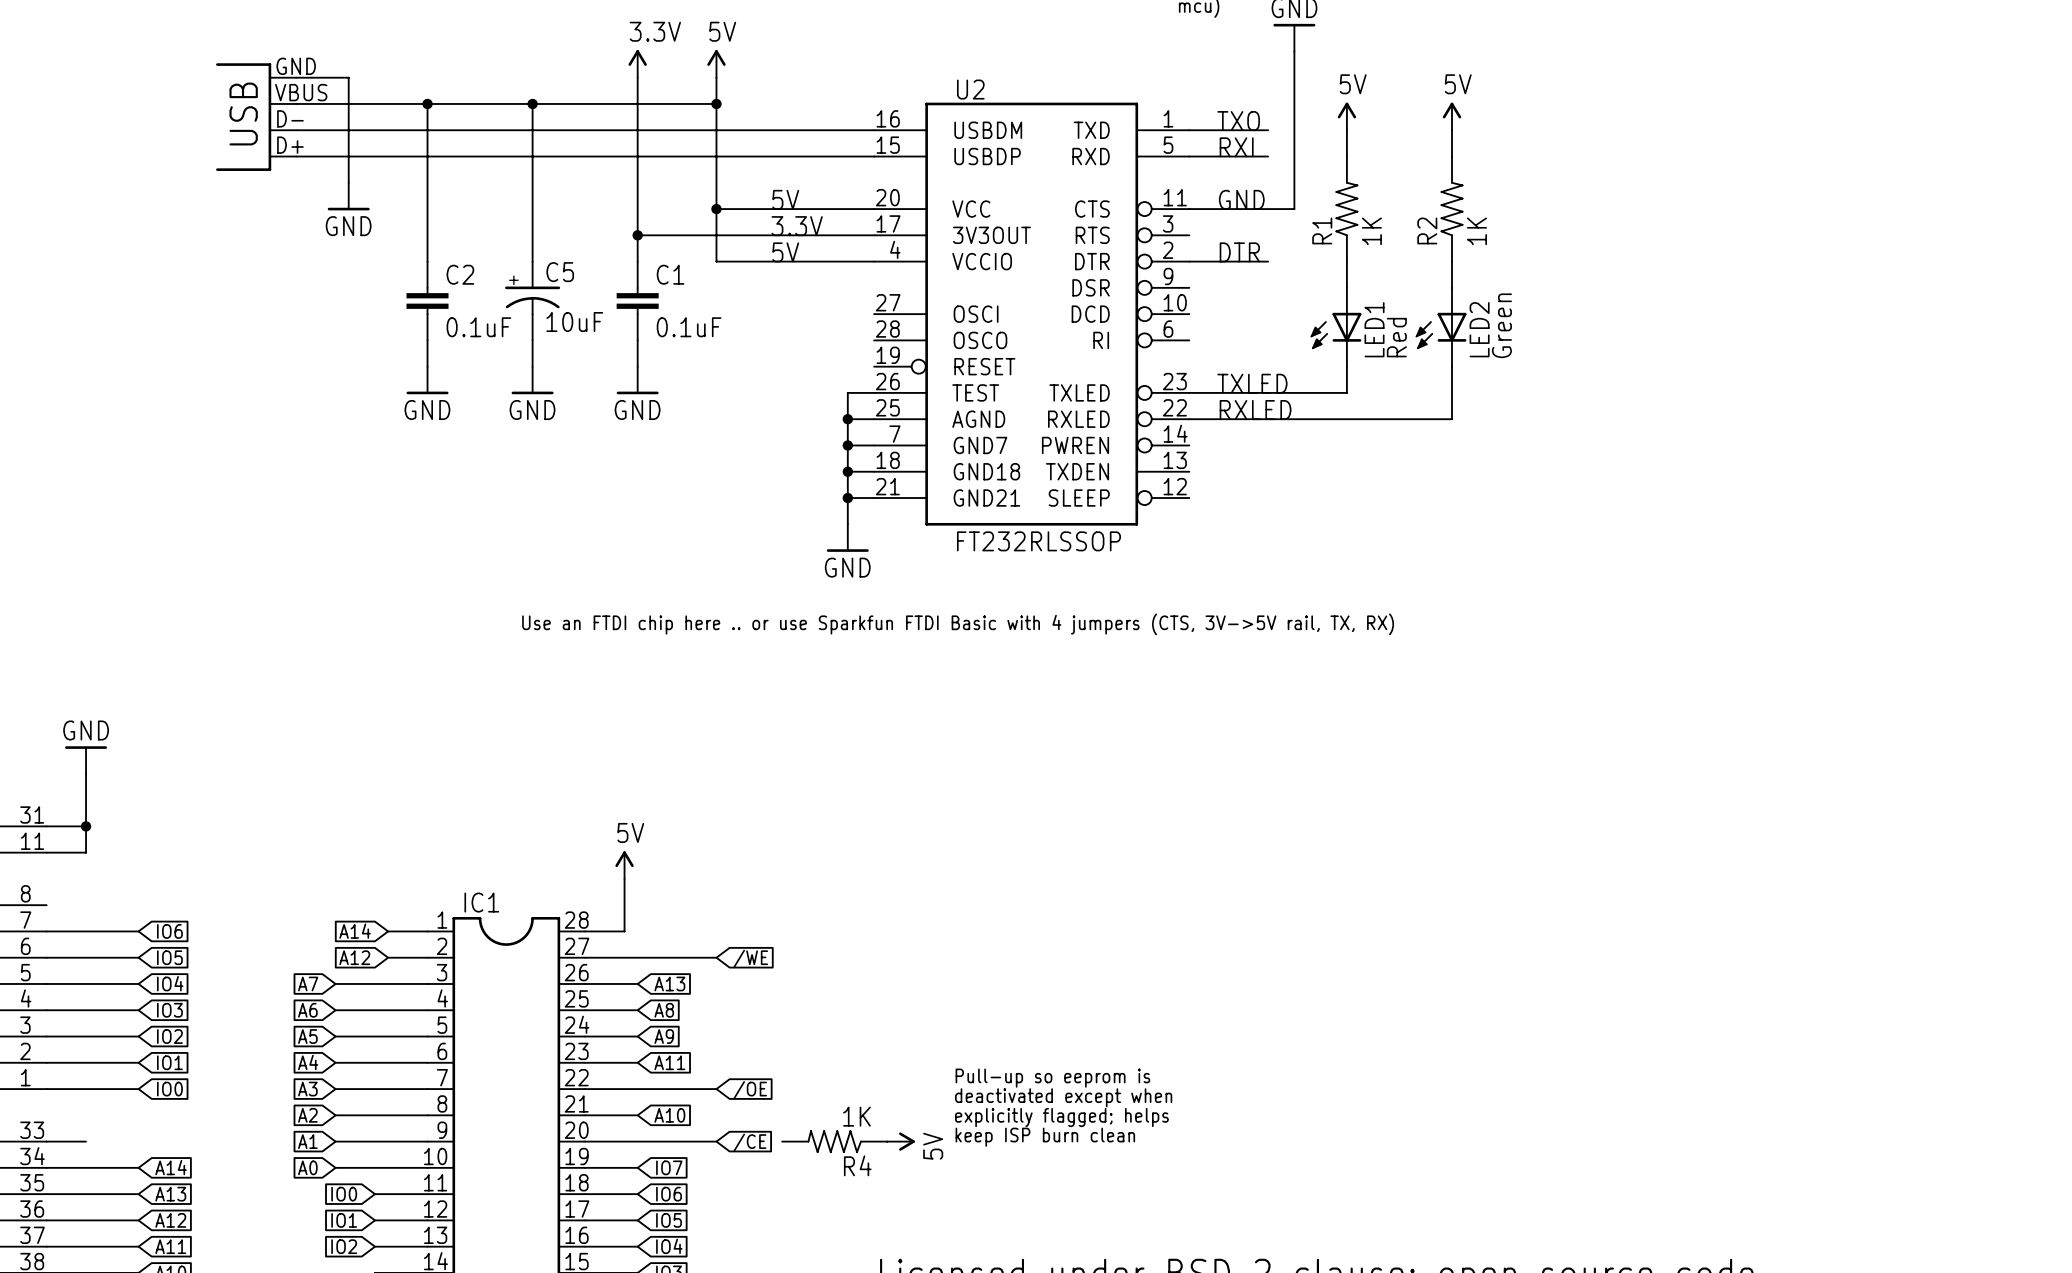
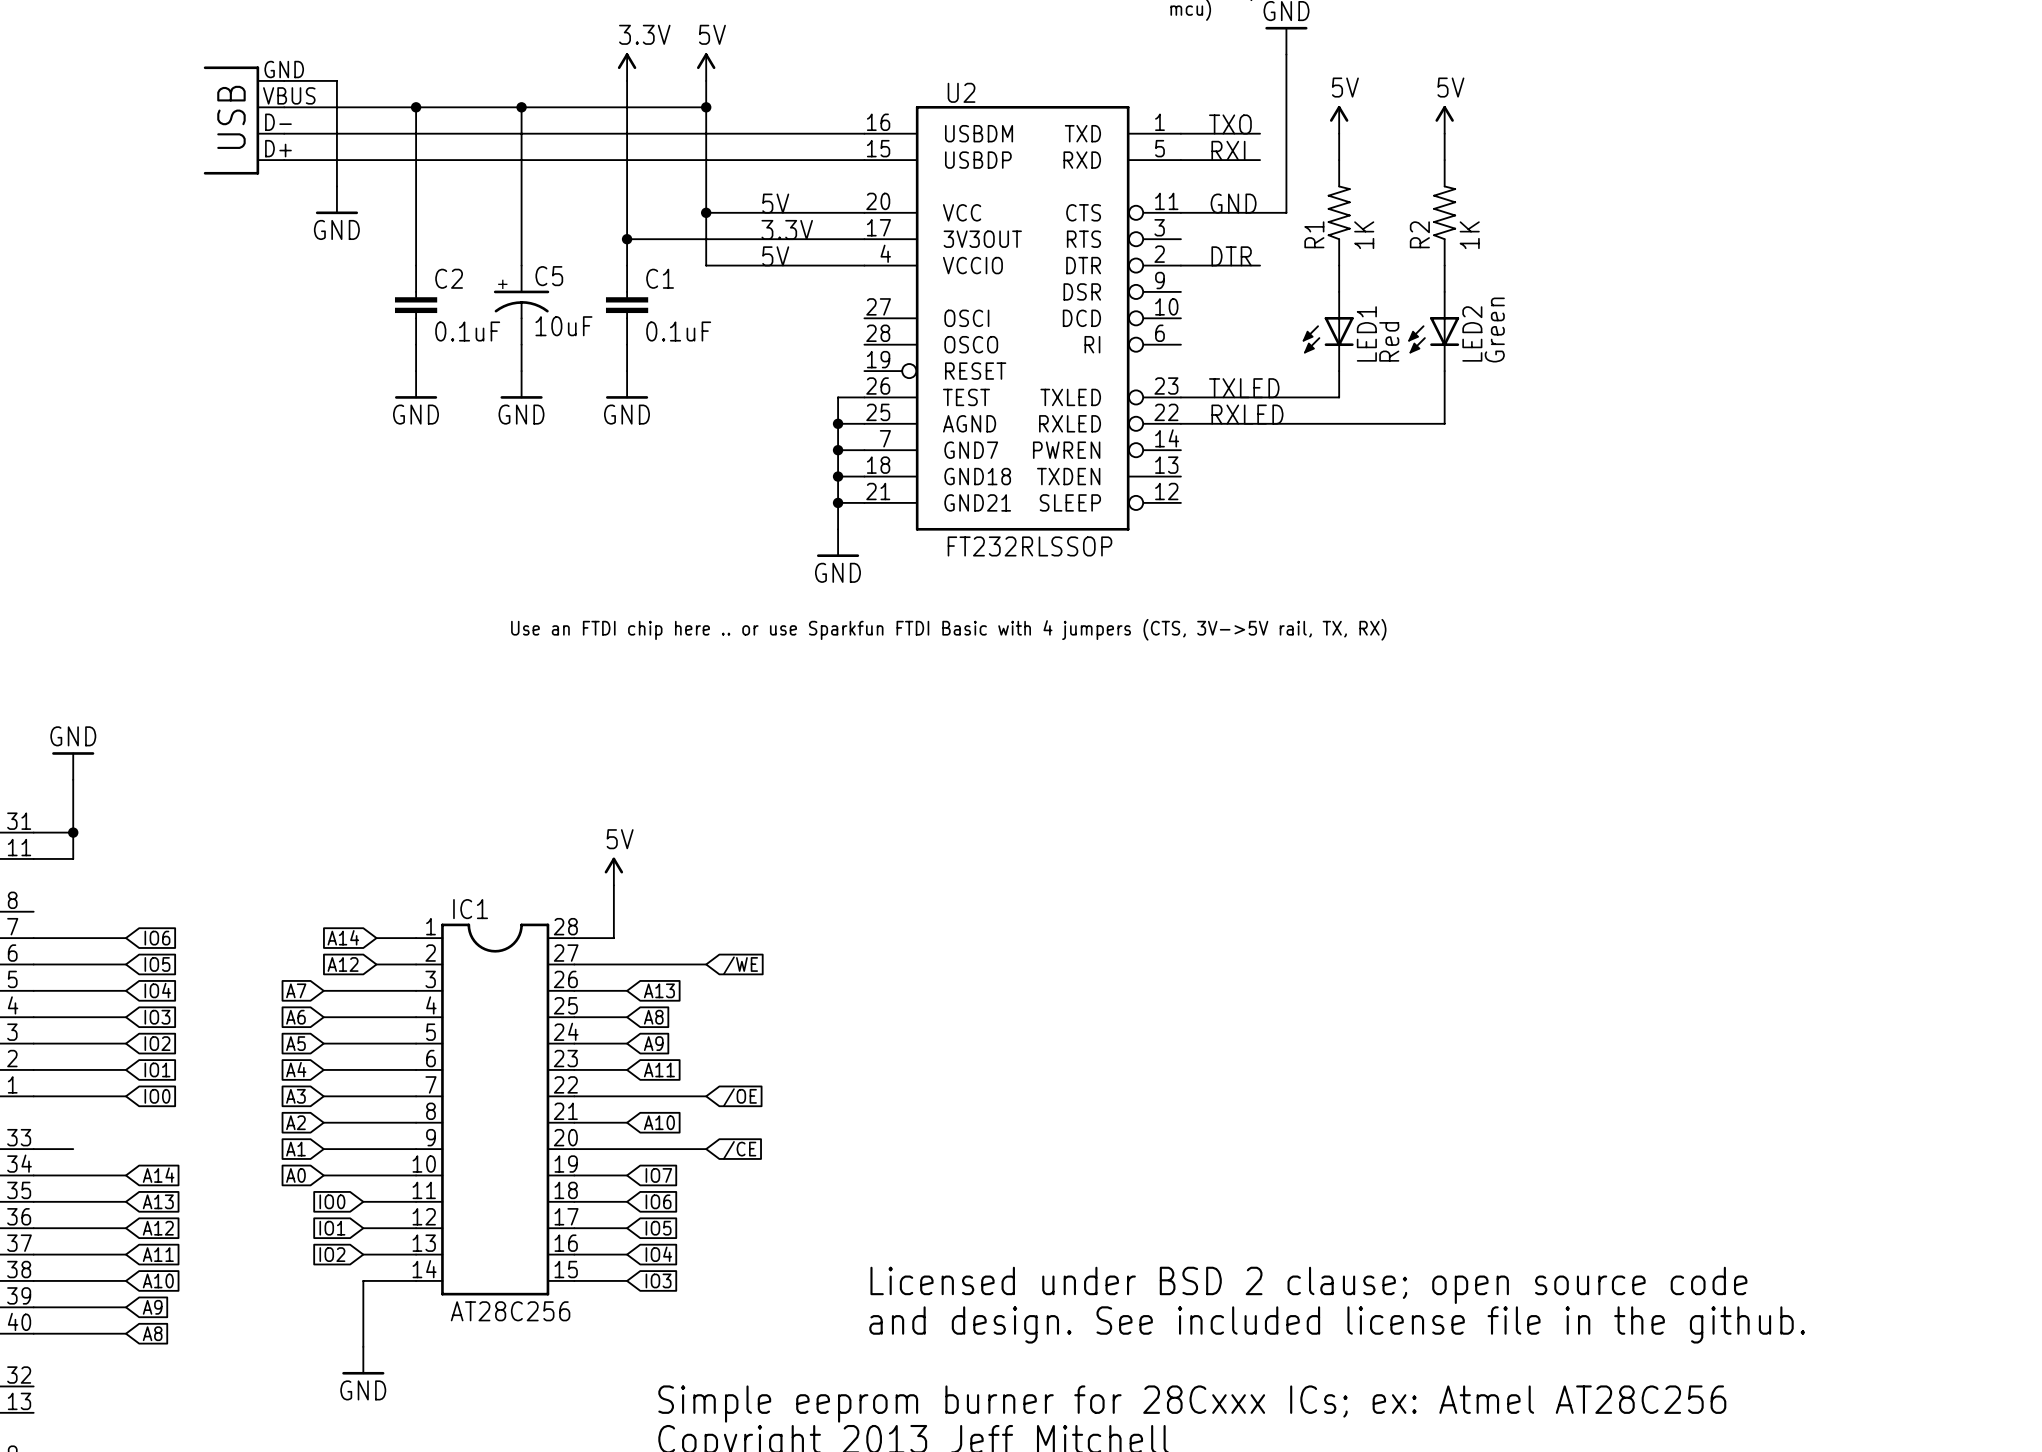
text: Pull-up so eeprom is (1052, 1078) -> none
text: deactivated except when (1063, 1097) -> none
text: explicitly flagged; helps (1061, 1117) -> none
text: keep ISP burn clean (1045, 1137) -> none
R4: 1K (834, 1141) -> none
power symbol: 5V (901, 1141) -> none

